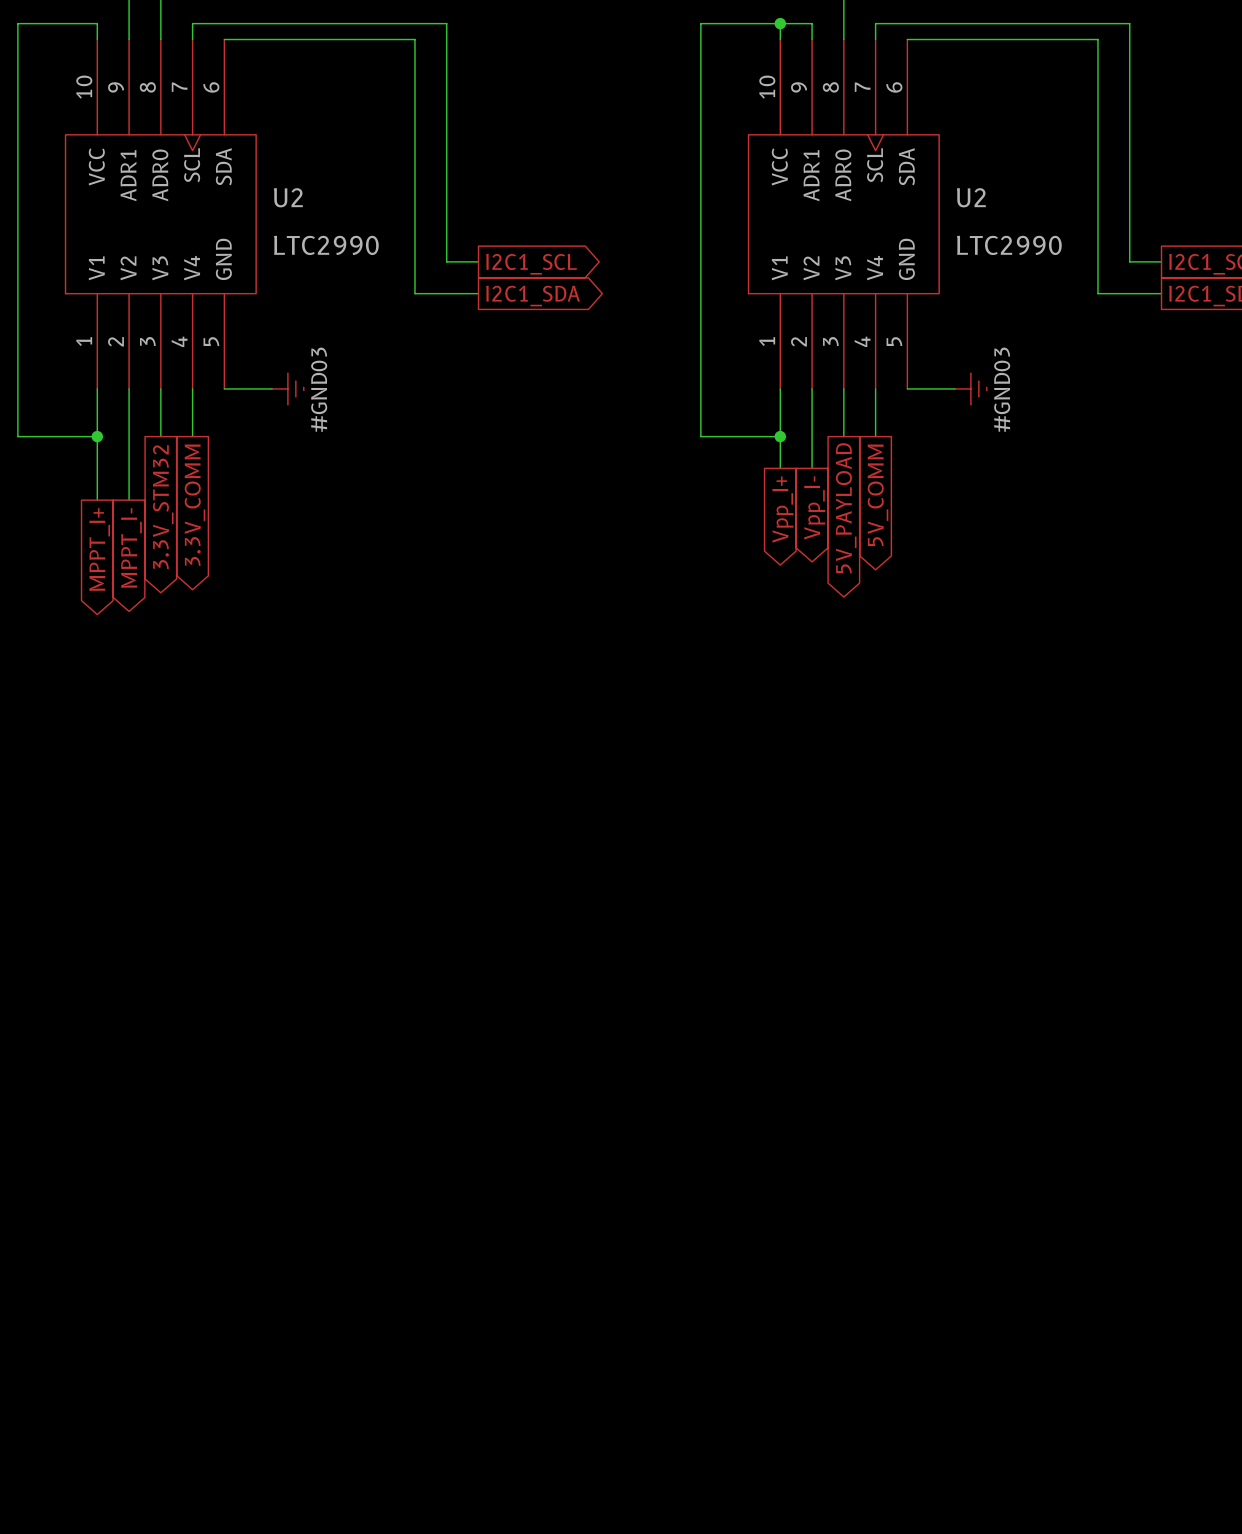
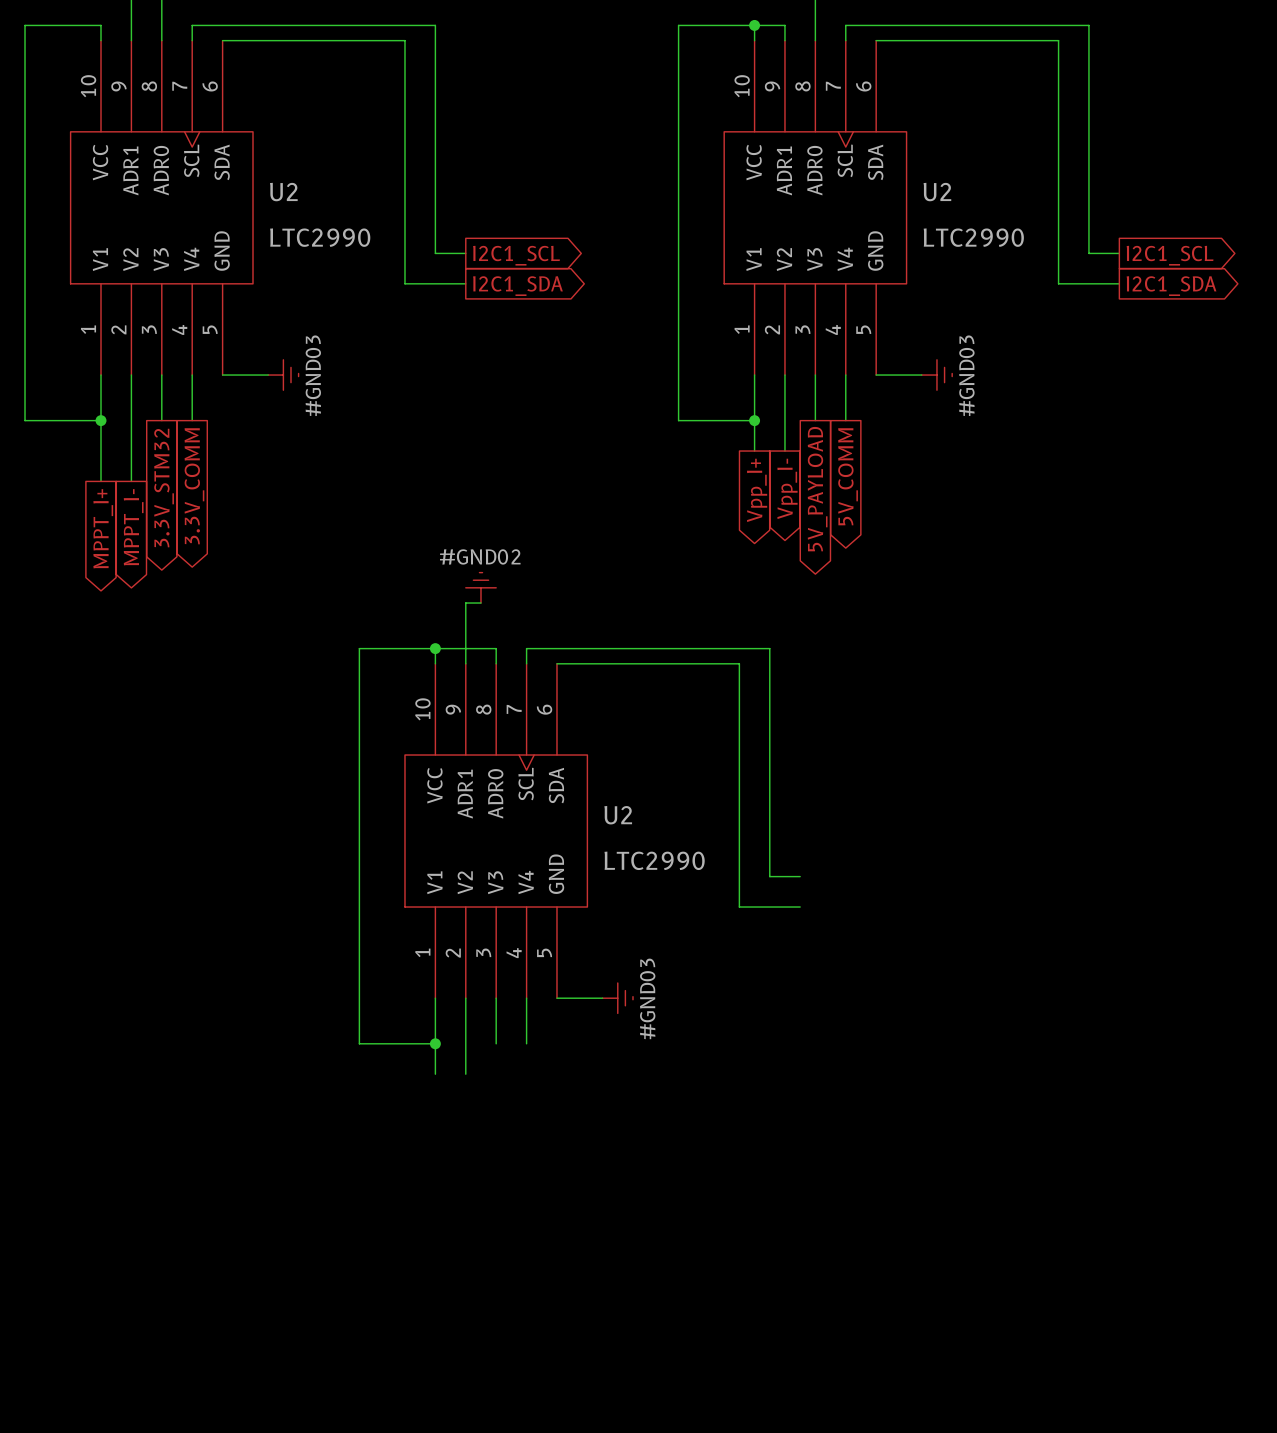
#GND02: none -> (480, 587)
wire: none -> (480, 603) (465, 603) (465, 663)
wire: none -> (435, 648) (435, 663)
junction: none -> (435, 648)
wire: none -> (496, 663) (496, 648) (359, 648) (359, 1043) (435, 1043)
wire: none -> (526, 663) (526, 648) (769, 648) (769, 876) (800, 876)
wire: none -> (556, 663) (739, 663) (739, 907) (800, 907)
U2: none -> LTC2990 (496, 831)
wire: none -> (435, 998) (435, 1074)
wire: none -> (465, 998) (465, 1074)
wire: none -> (496, 998) (496, 1043)
wire: none -> (526, 998) (526, 1043)
wire: none -> (556, 998) (602, 998)
#GND03: none -> (617, 998)
junction: none -> (435, 1043)

